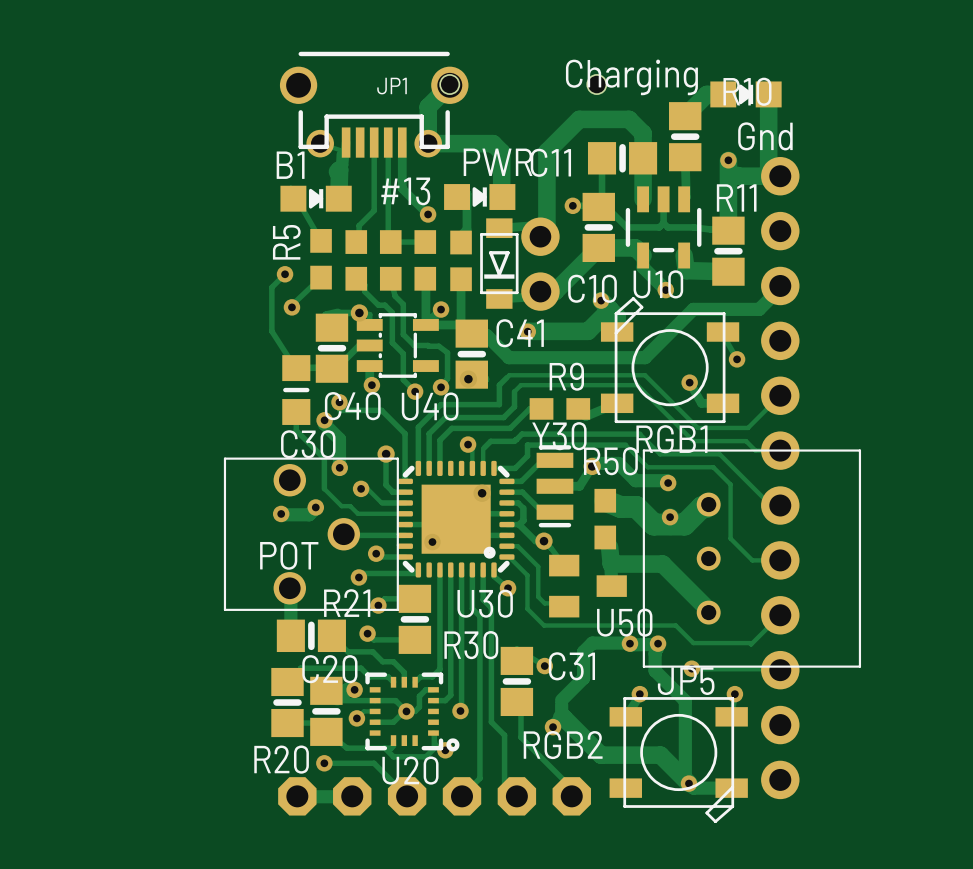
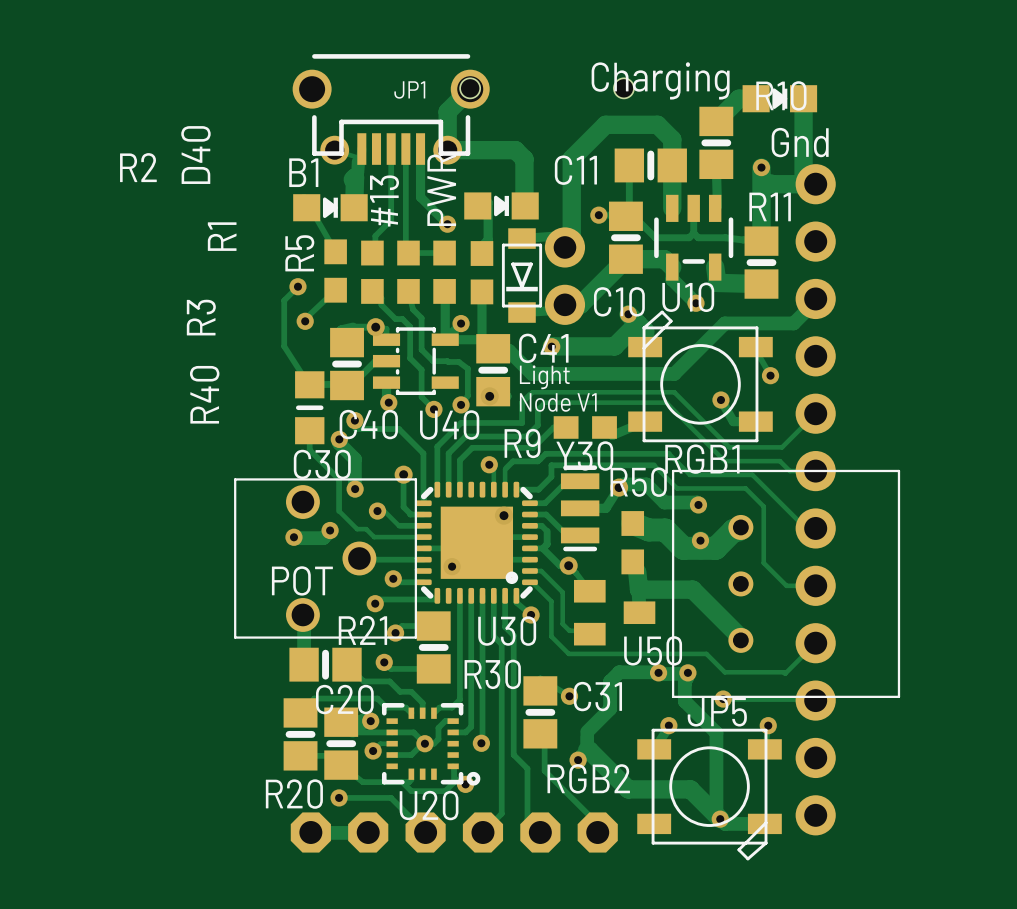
D40 name: none -> D40 (195, 155)
R2 name: none -> R2 (138, 167)
text rotation: 0° (498, 162) -> 90° counterclockwise (441, 190)
text rotation: 0° (405, 191) -> 90° counterclockwise (384, 200)
R1 name: none -> R1 (222, 236)
R3 name: none -> R3 (201, 317)
text: none -> Light (544, 377)
R9 name position: R9 (566, 376) -> R9 (522, 443)
R40 name: none -> R40 (204, 394)
text: none -> Node V1 (558, 402)

